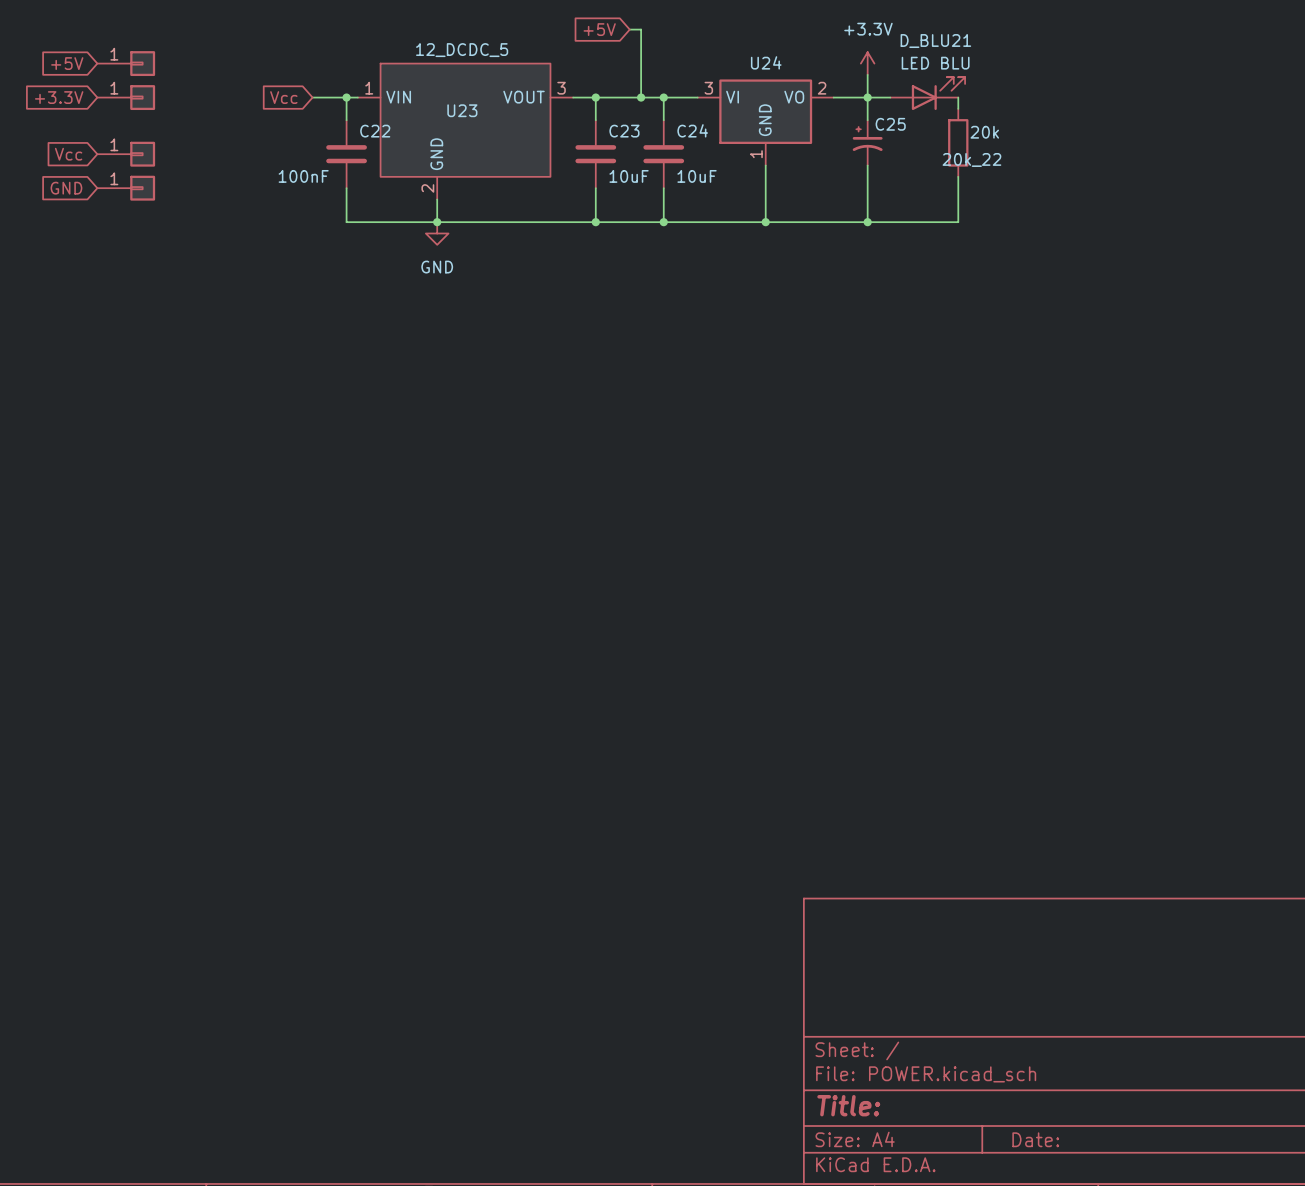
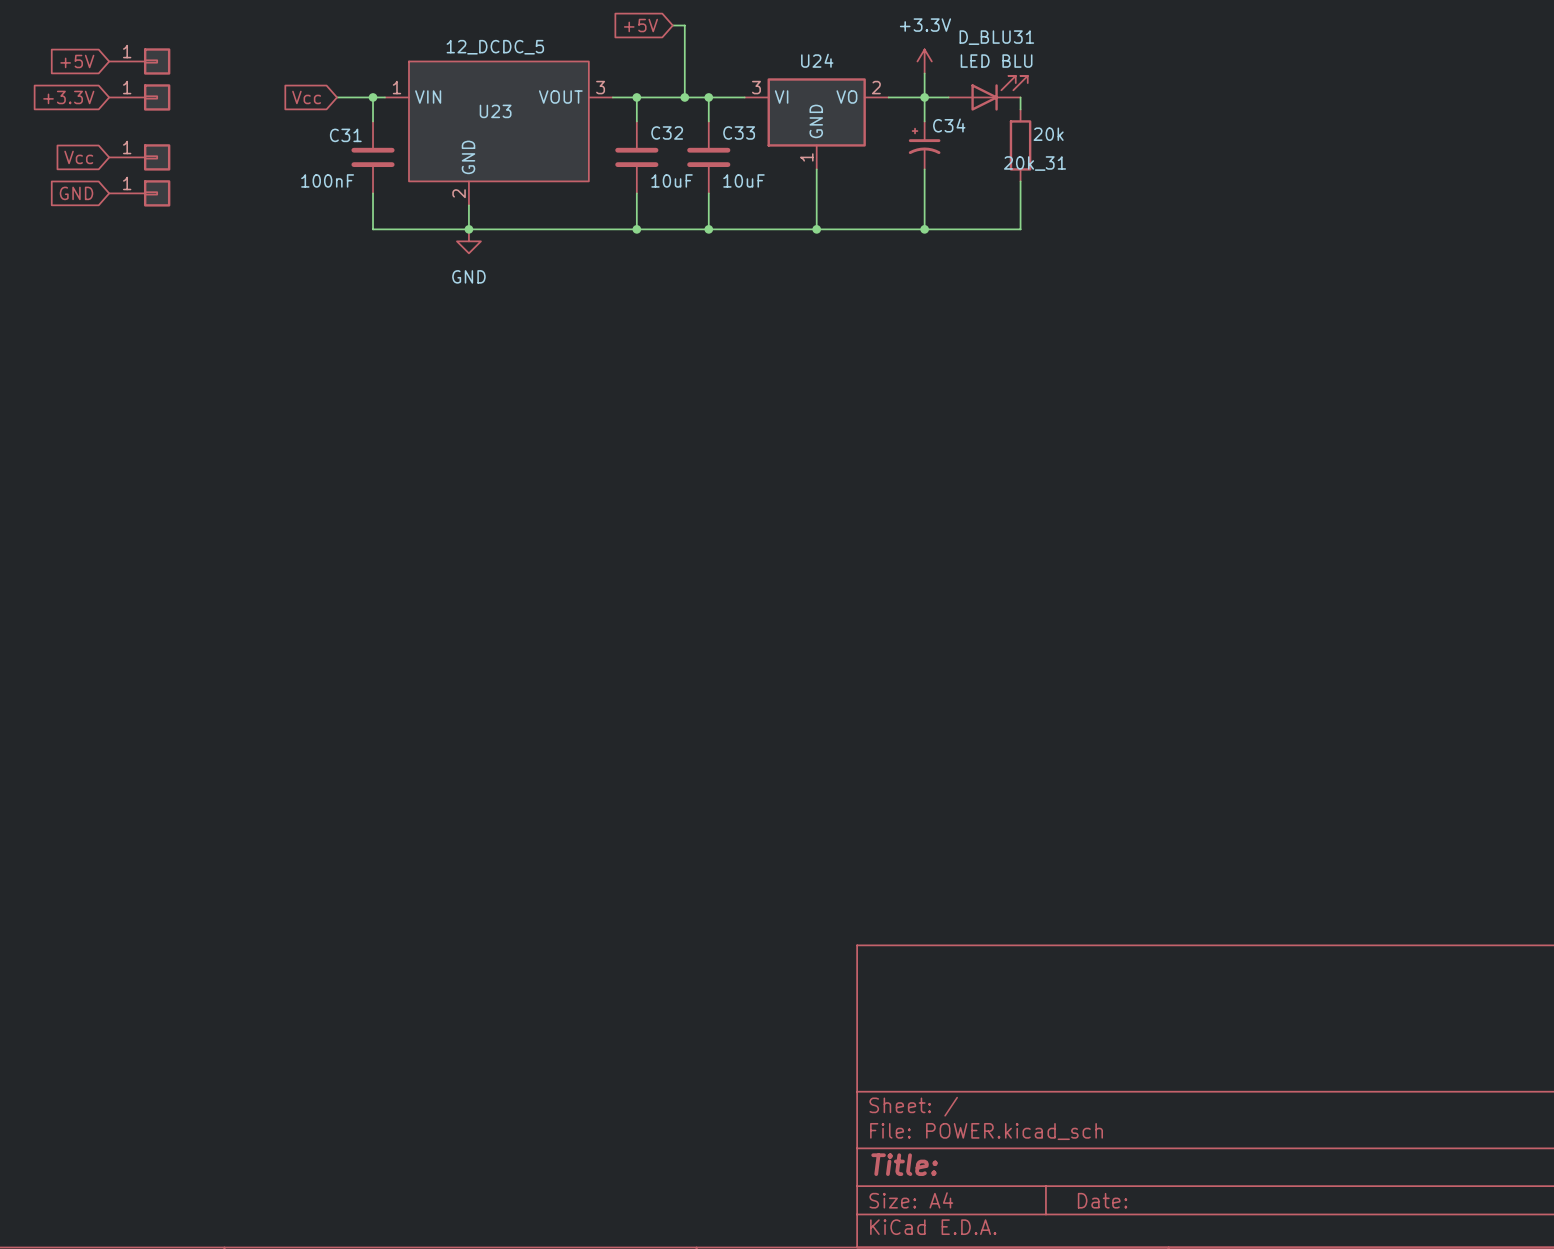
D_BLU21 name: D_BLU21 (935, 41) -> D_BLU31 (996, 37)
C25 name: C25 (890, 124) -> C34 (949, 125)
C24 name: C24 (692, 130) -> C33 (739, 132)
C22 name: C22 (375, 131) -> C31 (345, 135)
C23 name: C23 (624, 131) -> C32 (667, 132)
20k_22 name: 20k_22 (971, 159) -> 20k_31 (1035, 163)

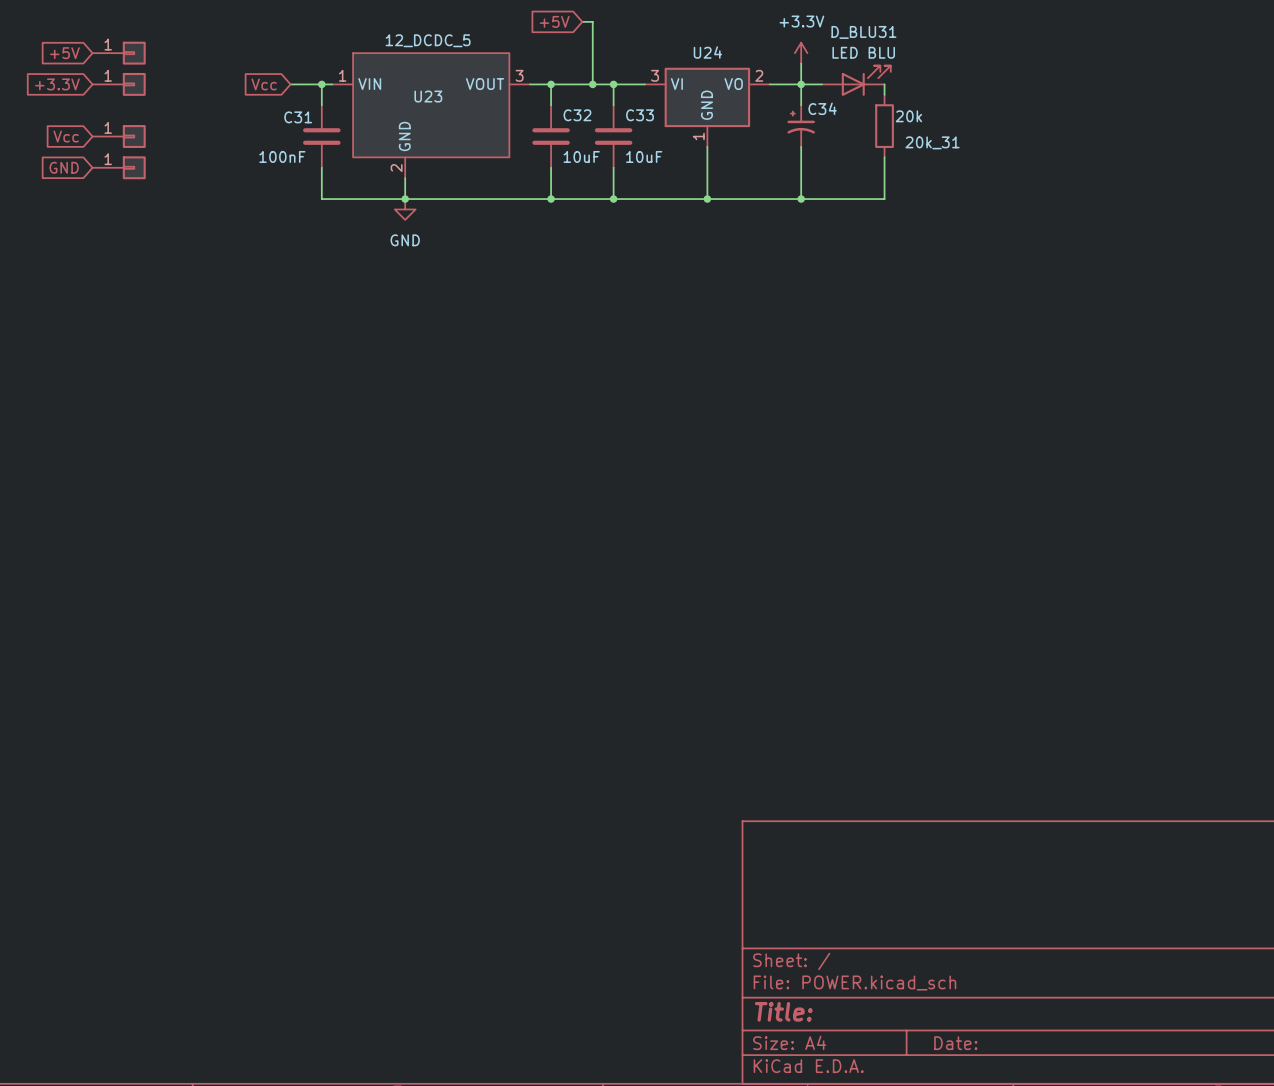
20k_31 name position: 20k_31 (1035, 163) -> 20k_31 (932, 142)

